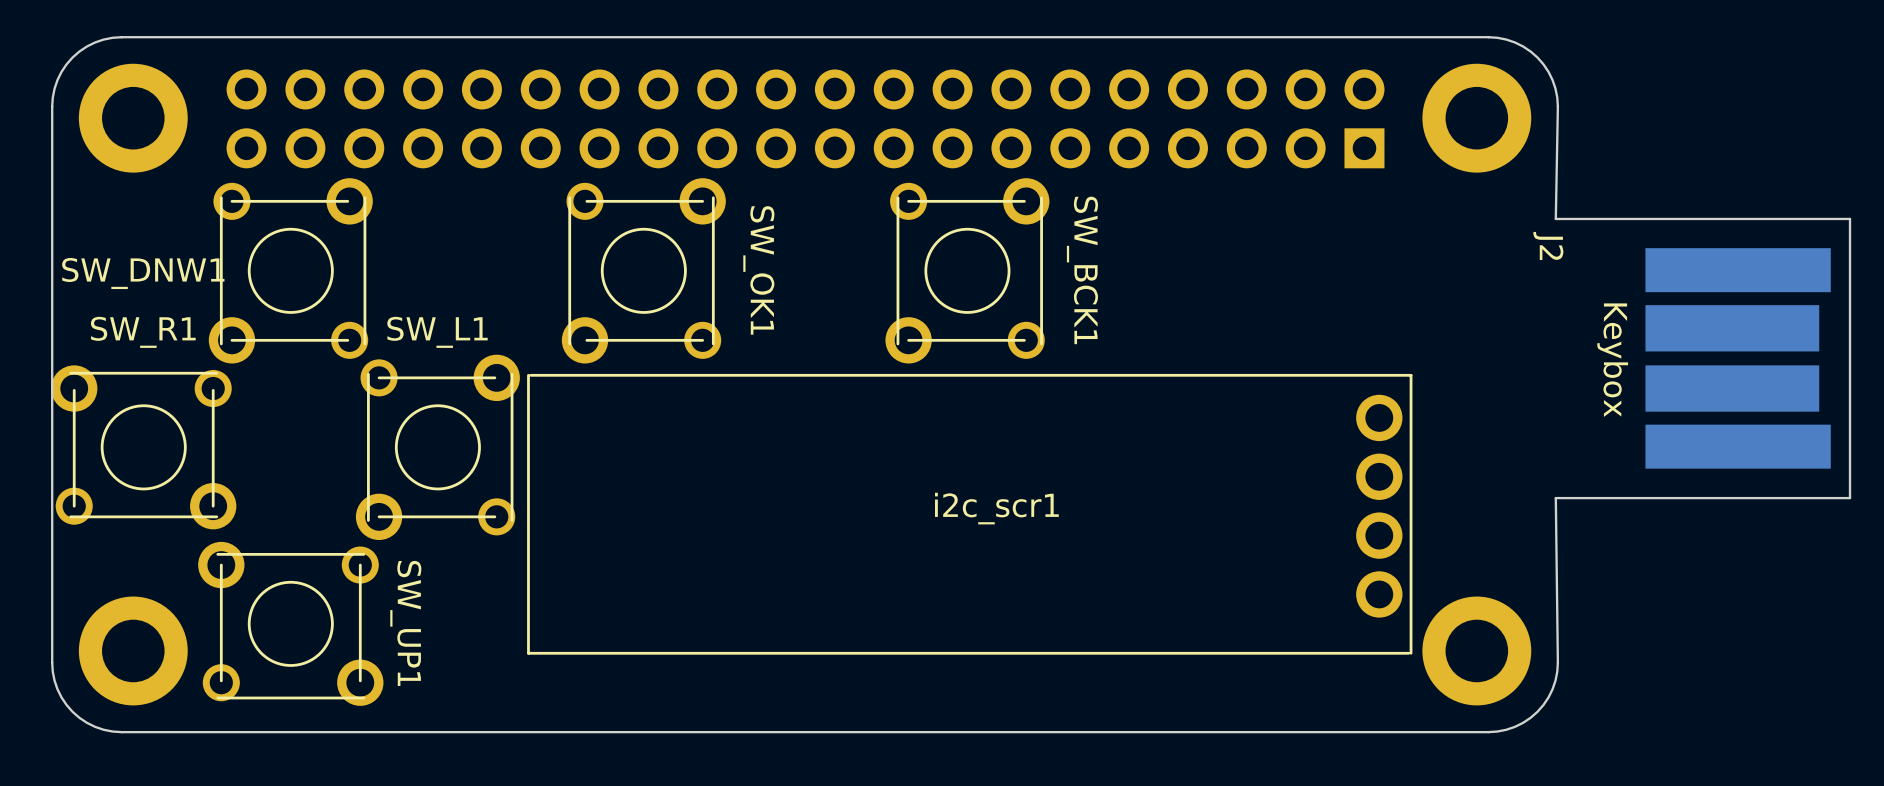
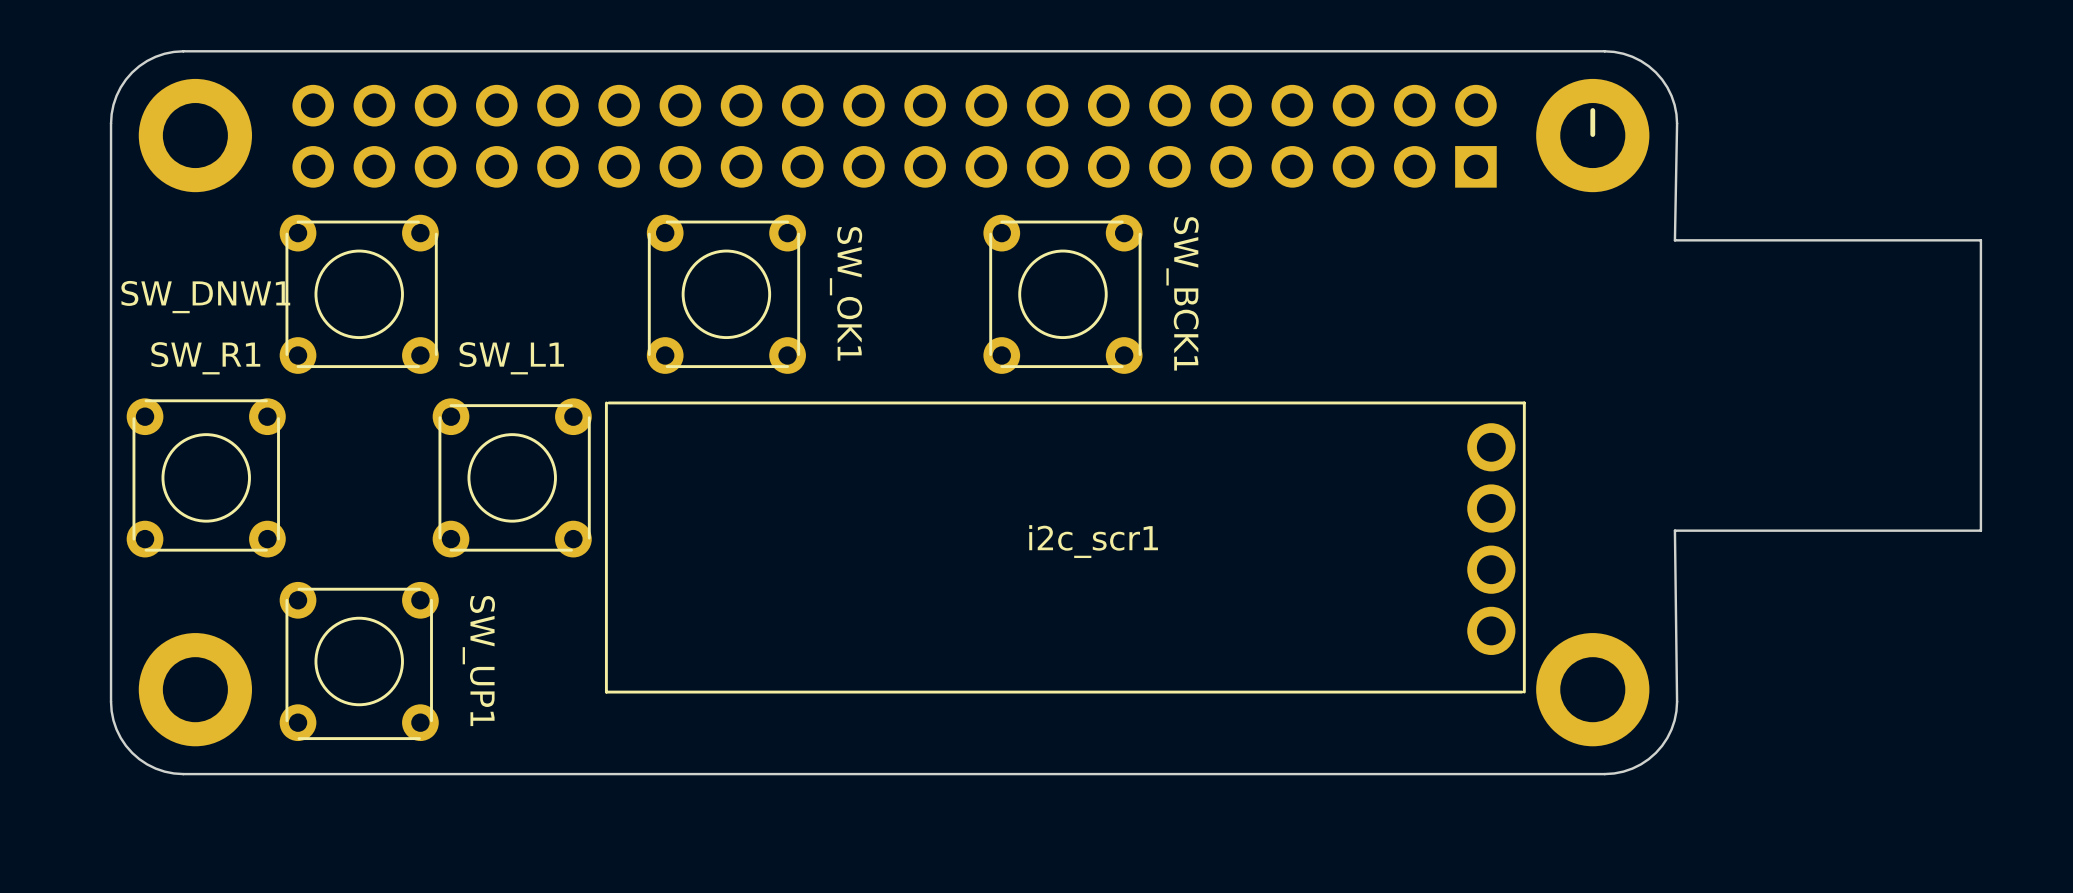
line: none -> (1592, 110) (1592, 134)
SW_DNW1 footprint: [208, 178, 373, 364] -> [279, 214, 439, 374]
SW_OK1 footprint: [561, 178, 726, 364] -> [646, 214, 806, 374]
SW_BCK1 footprint: [885, 178, 1050, 364] -> [983, 214, 1143, 374]
SW_L1 footprint: [355, 354, 520, 541] -> [432, 398, 592, 558]
J2: (1738, 358) -> none
SW_R1 footprint: [51, 365, 237, 530] -> [126, 398, 286, 558]
SW_UP1 footprint: [198, 541, 384, 706] -> [279, 581, 439, 742]

